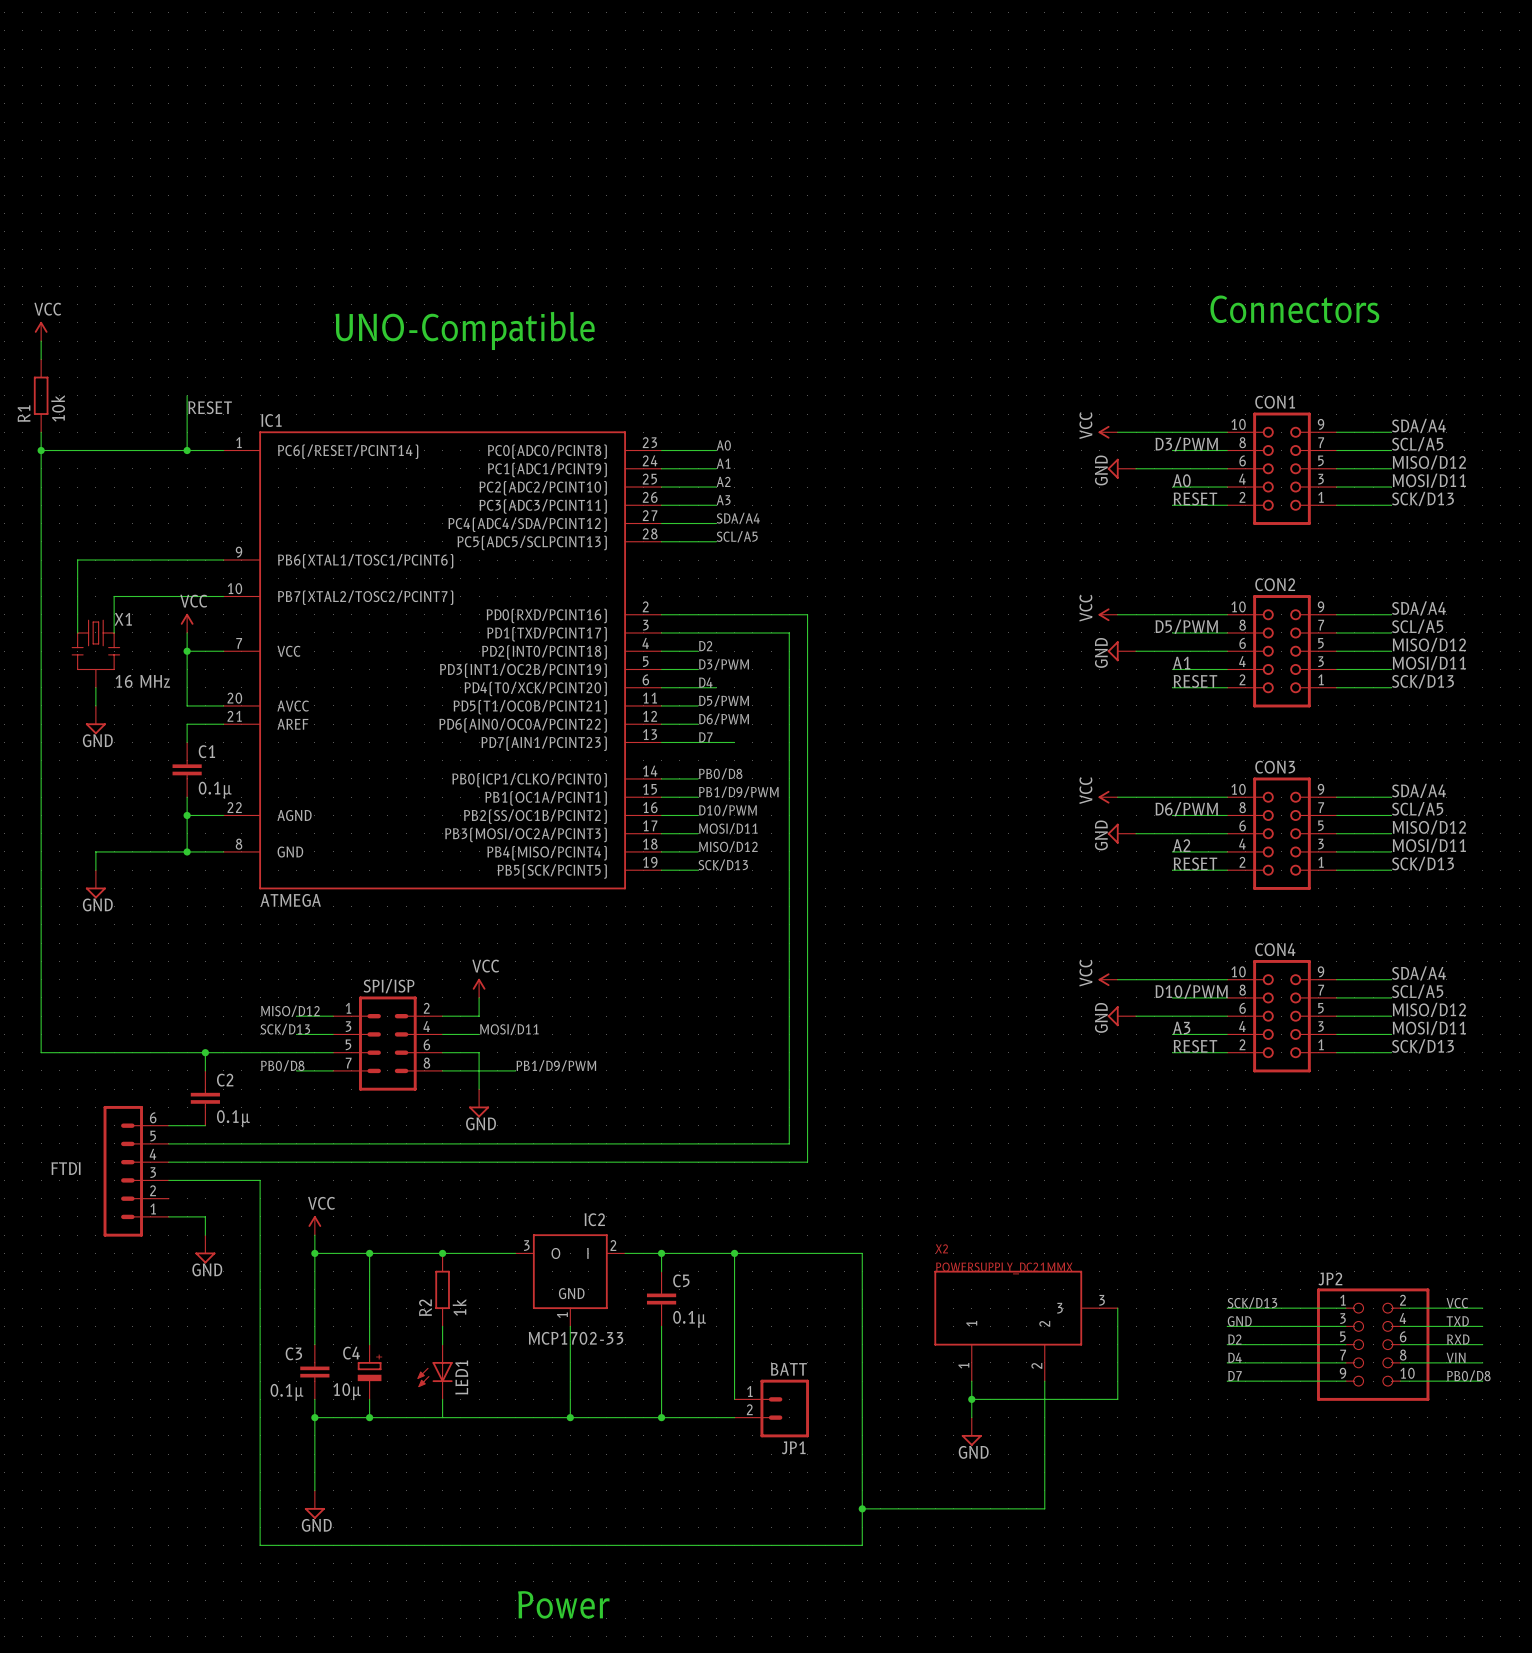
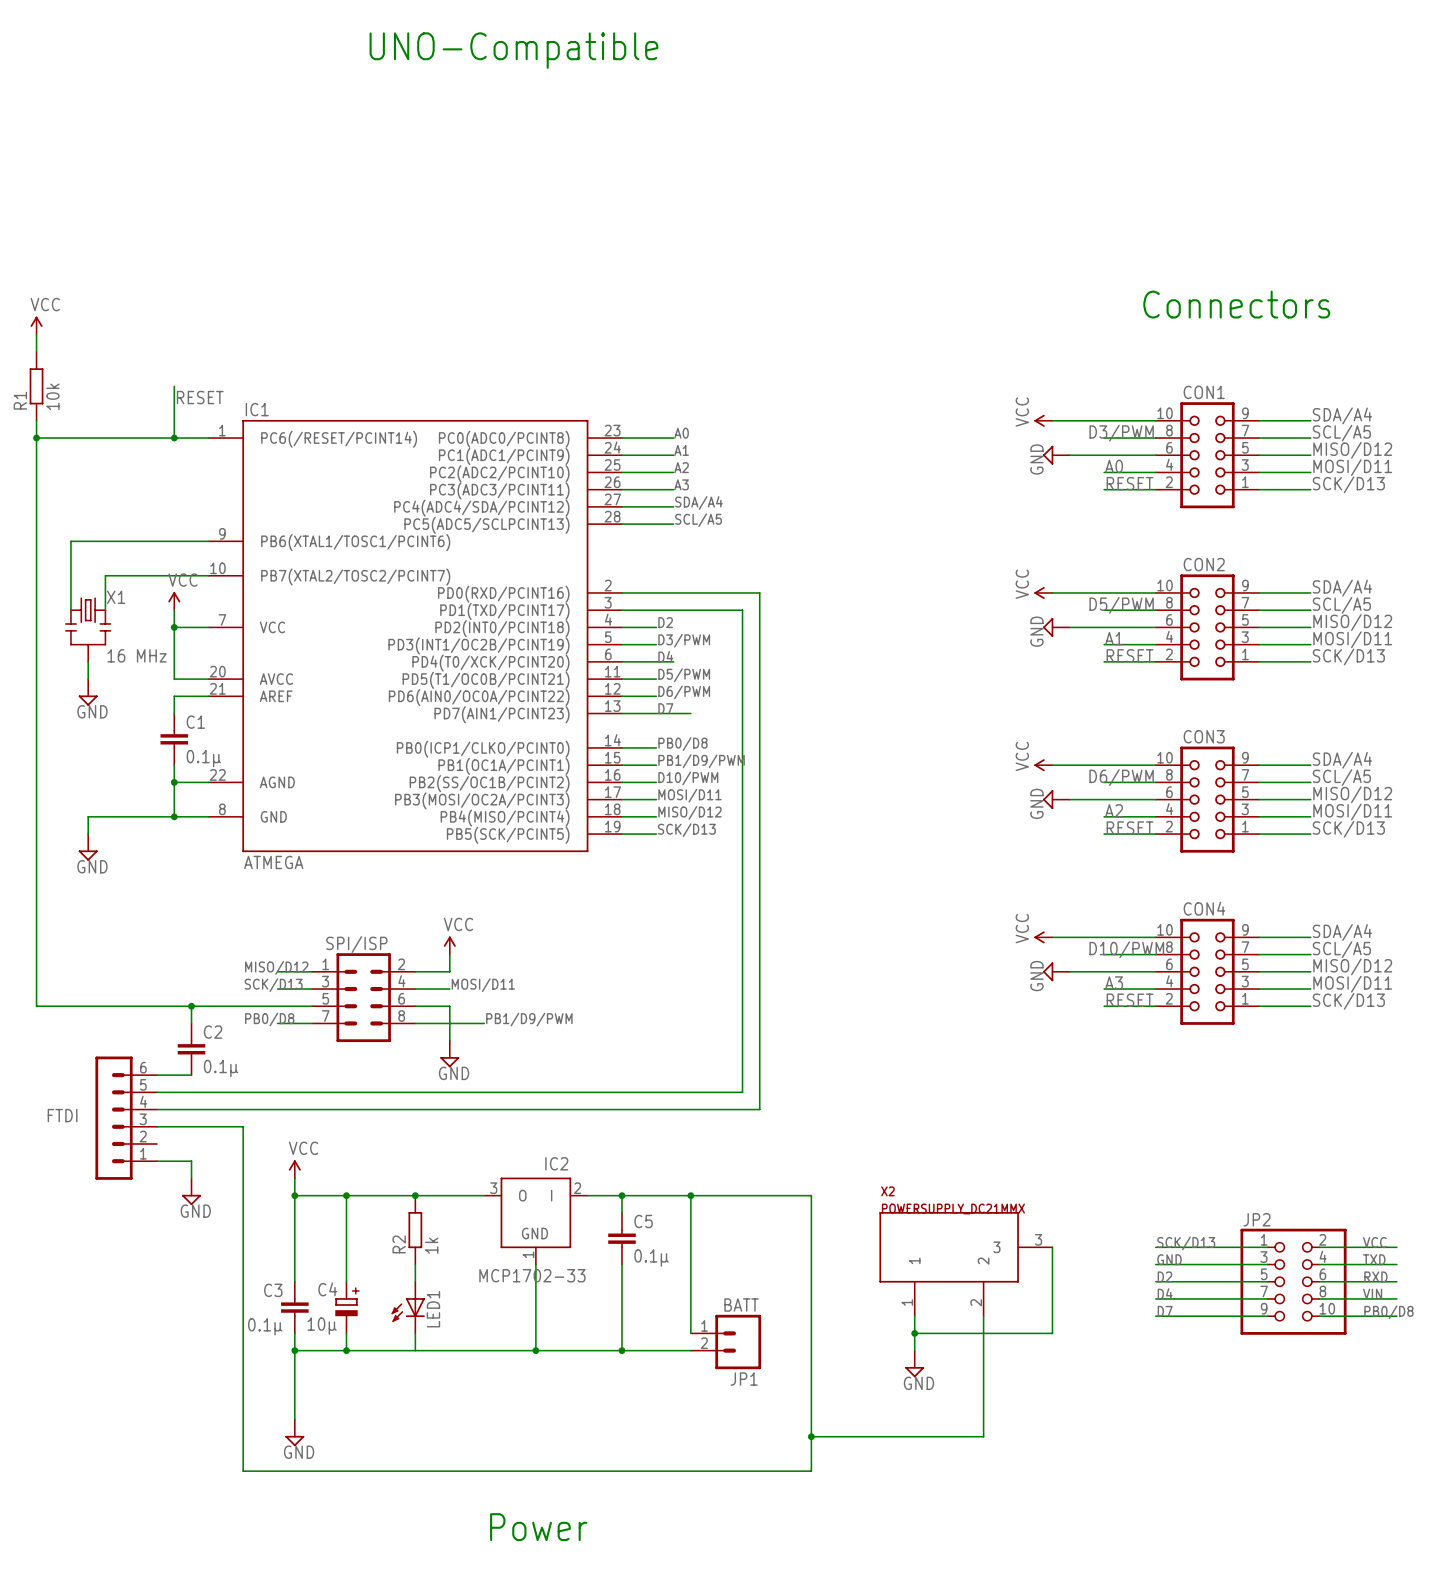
text: none -> UNO-Compatible (513, 50)
text: UNO-Compatible (465, 330) -> none

